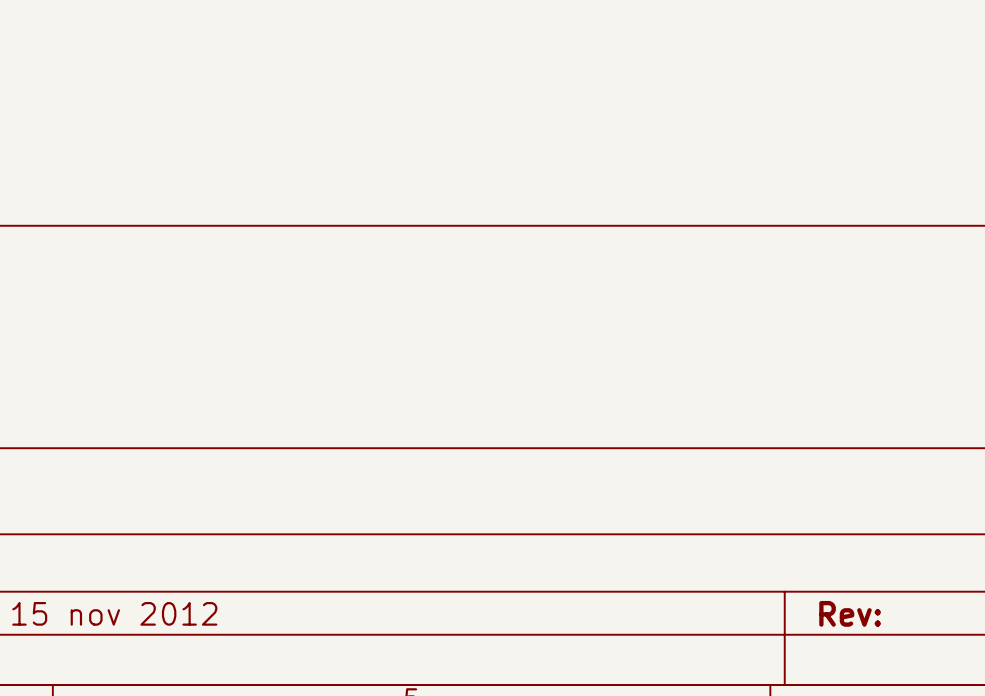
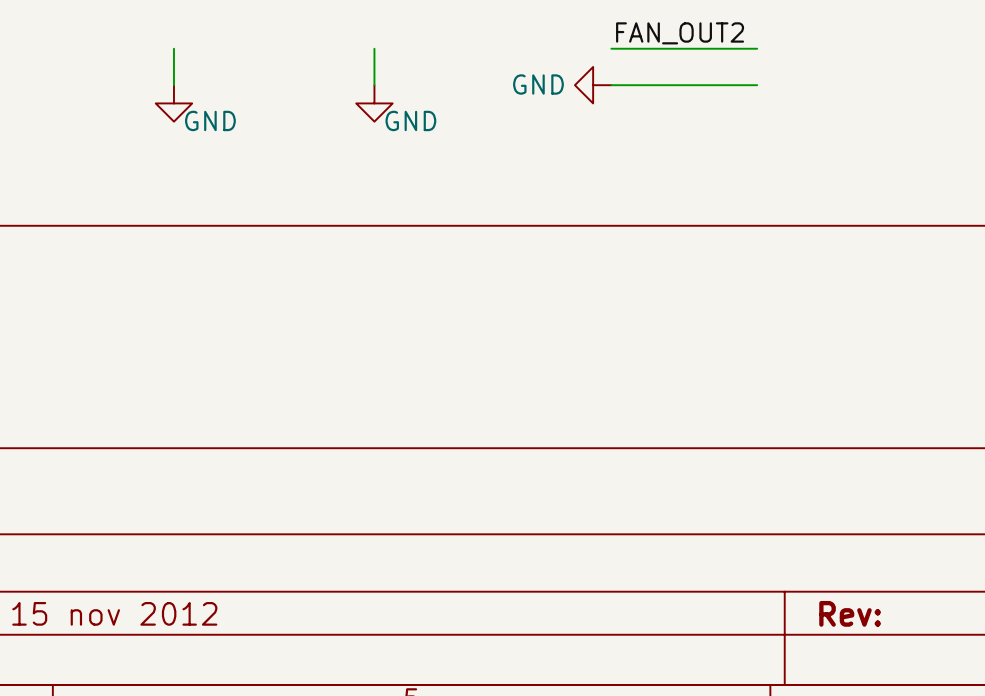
label: none -> FAN_OUT2 (680, 33)
wire: none -> (173, 48) (173, 85)
wire: none -> (374, 48) (374, 85)
wire: none -> (611, 48) (757, 48)
power symbol: none -> GND (593, 85)
wire: none -> (611, 85) (757, 85)
power symbol: none -> GND (173, 103)
power symbol: none -> GND (374, 103)

